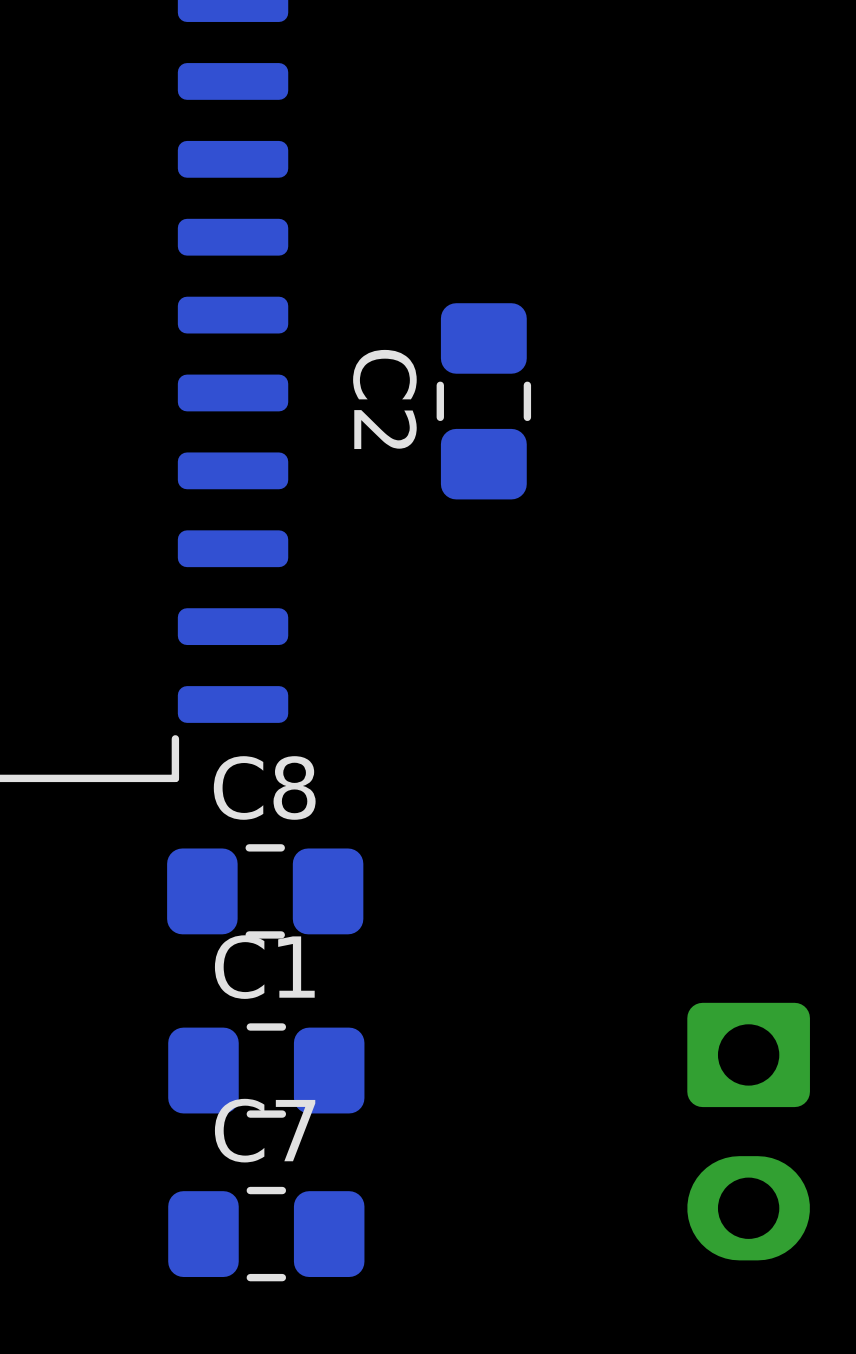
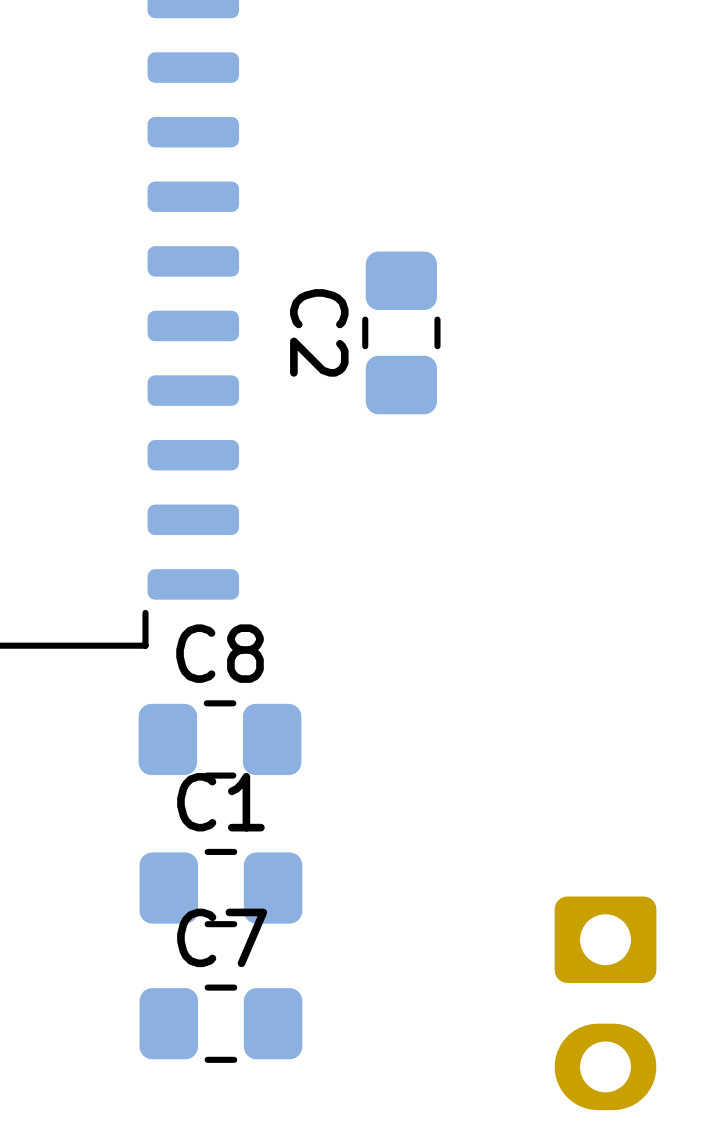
part position: (748, 1131) -> (605, 1003)

